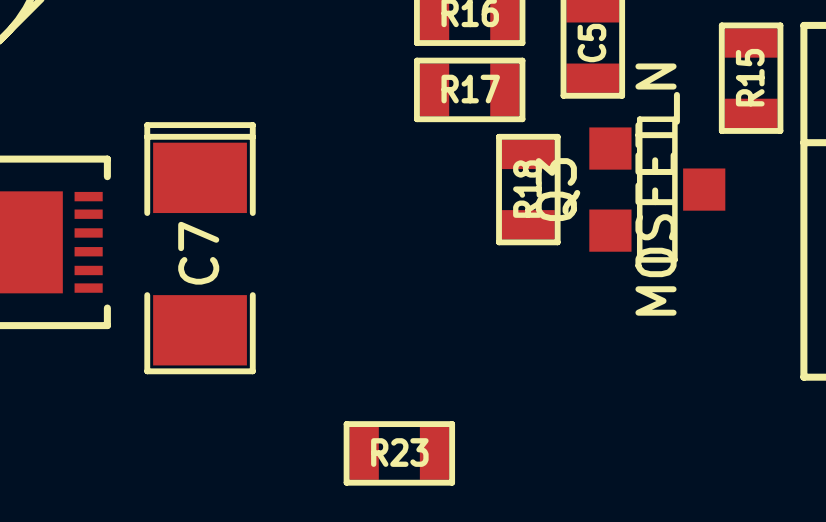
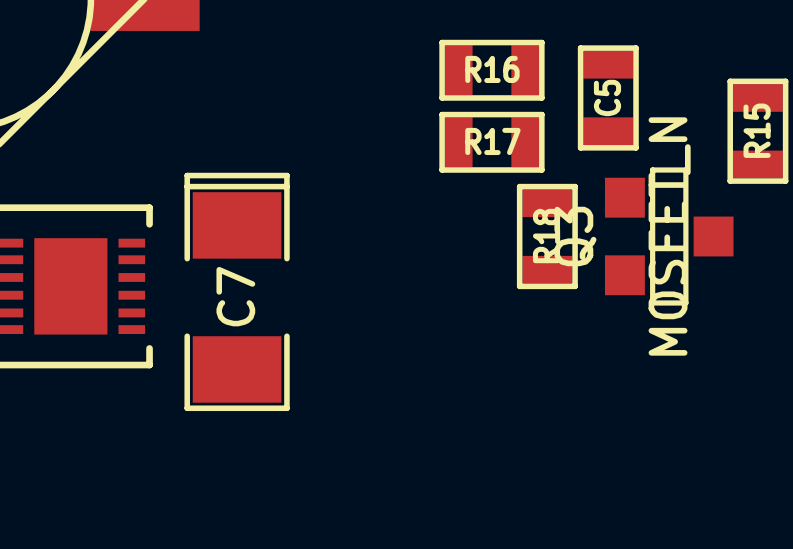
R23: (399, 453) -> none

